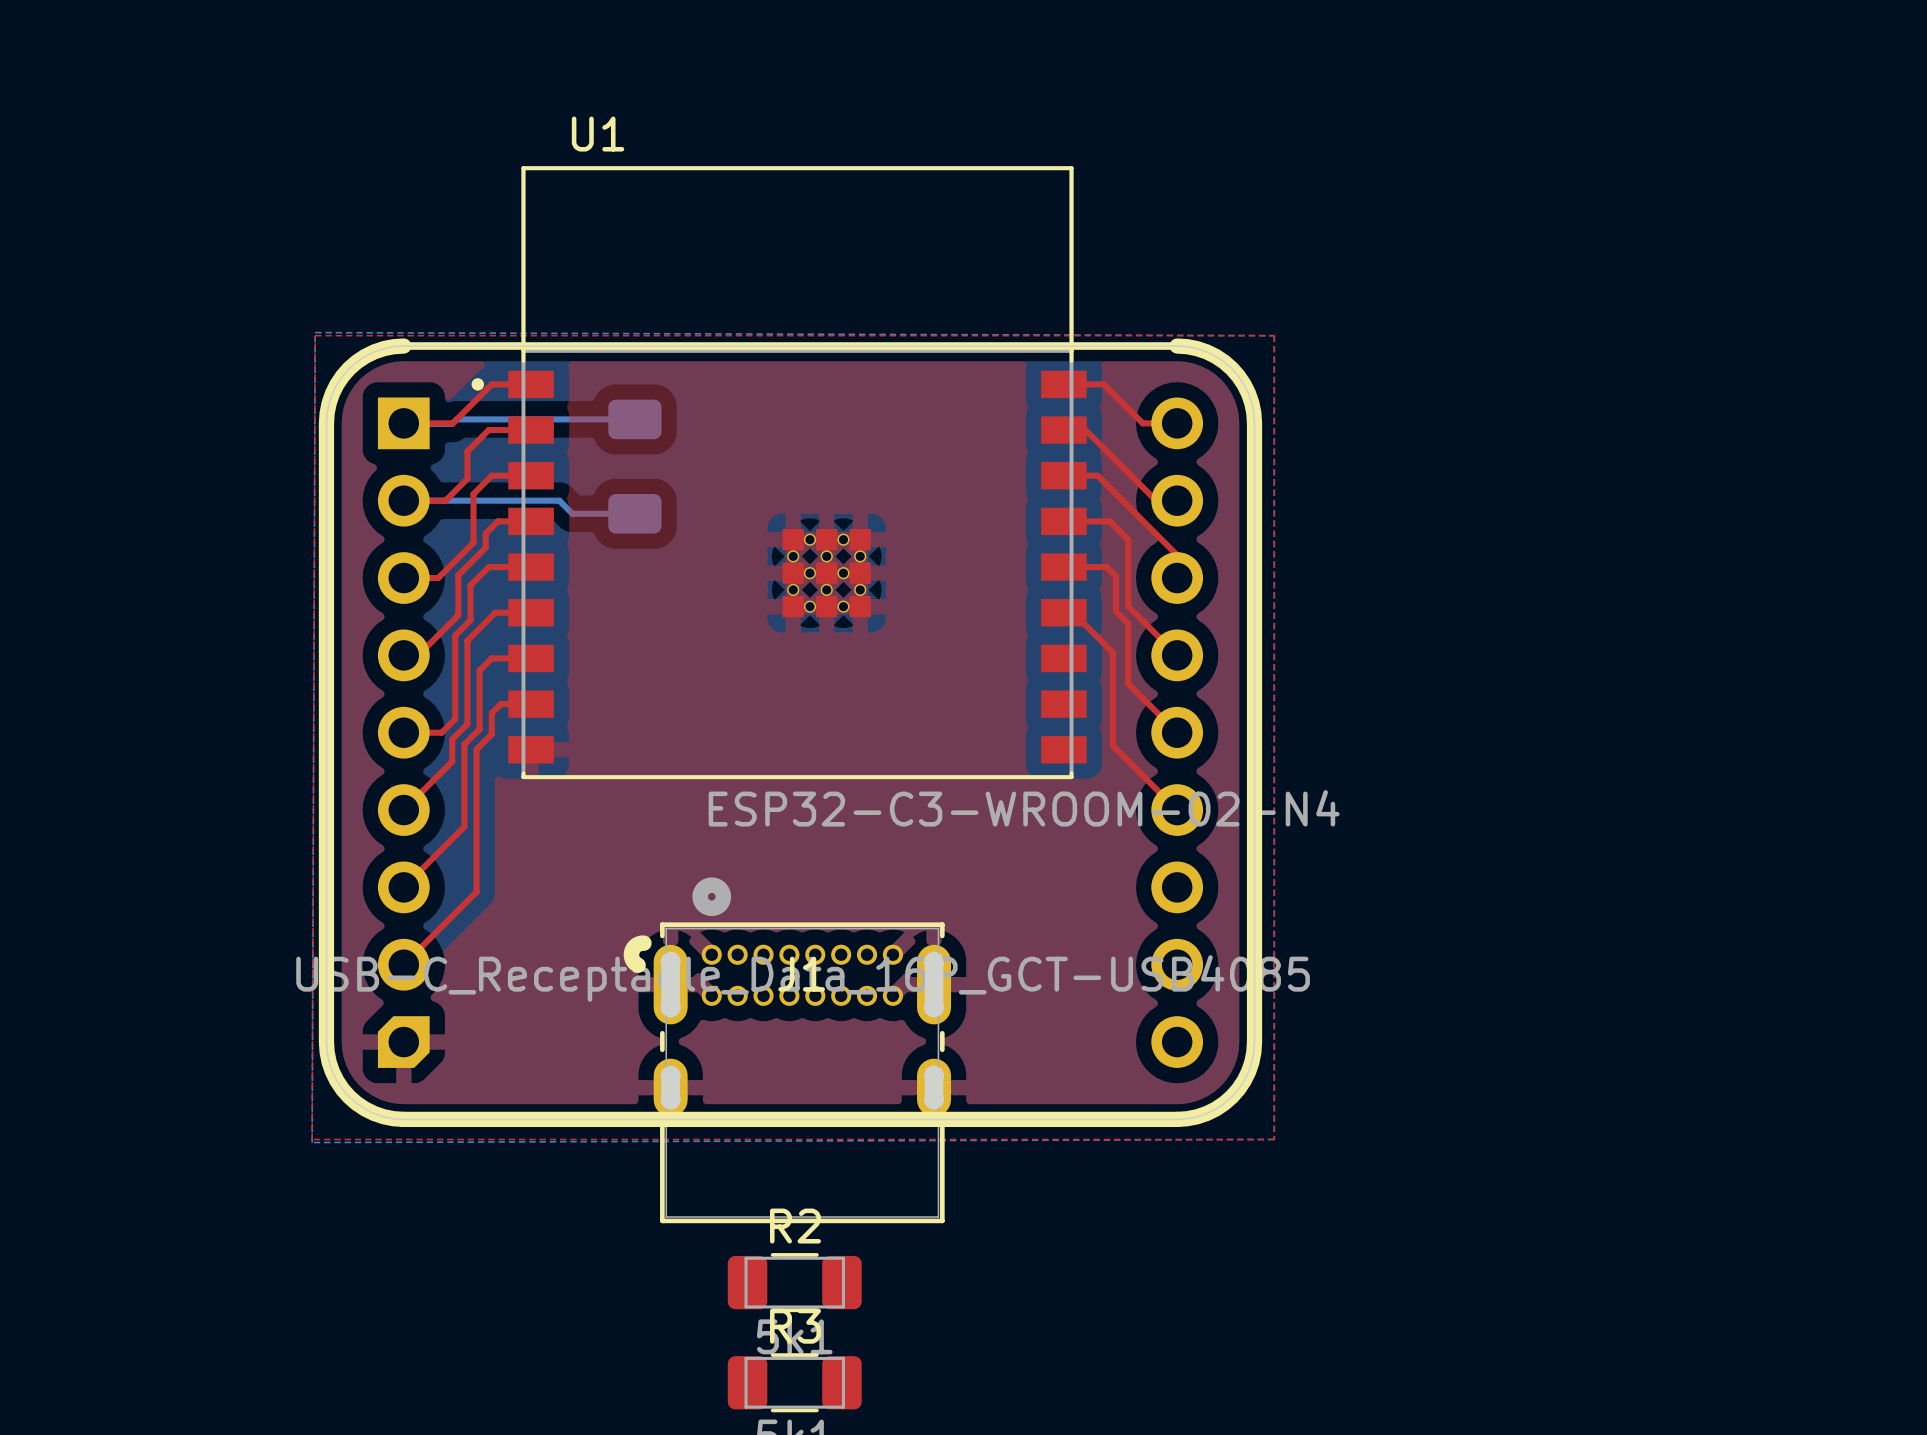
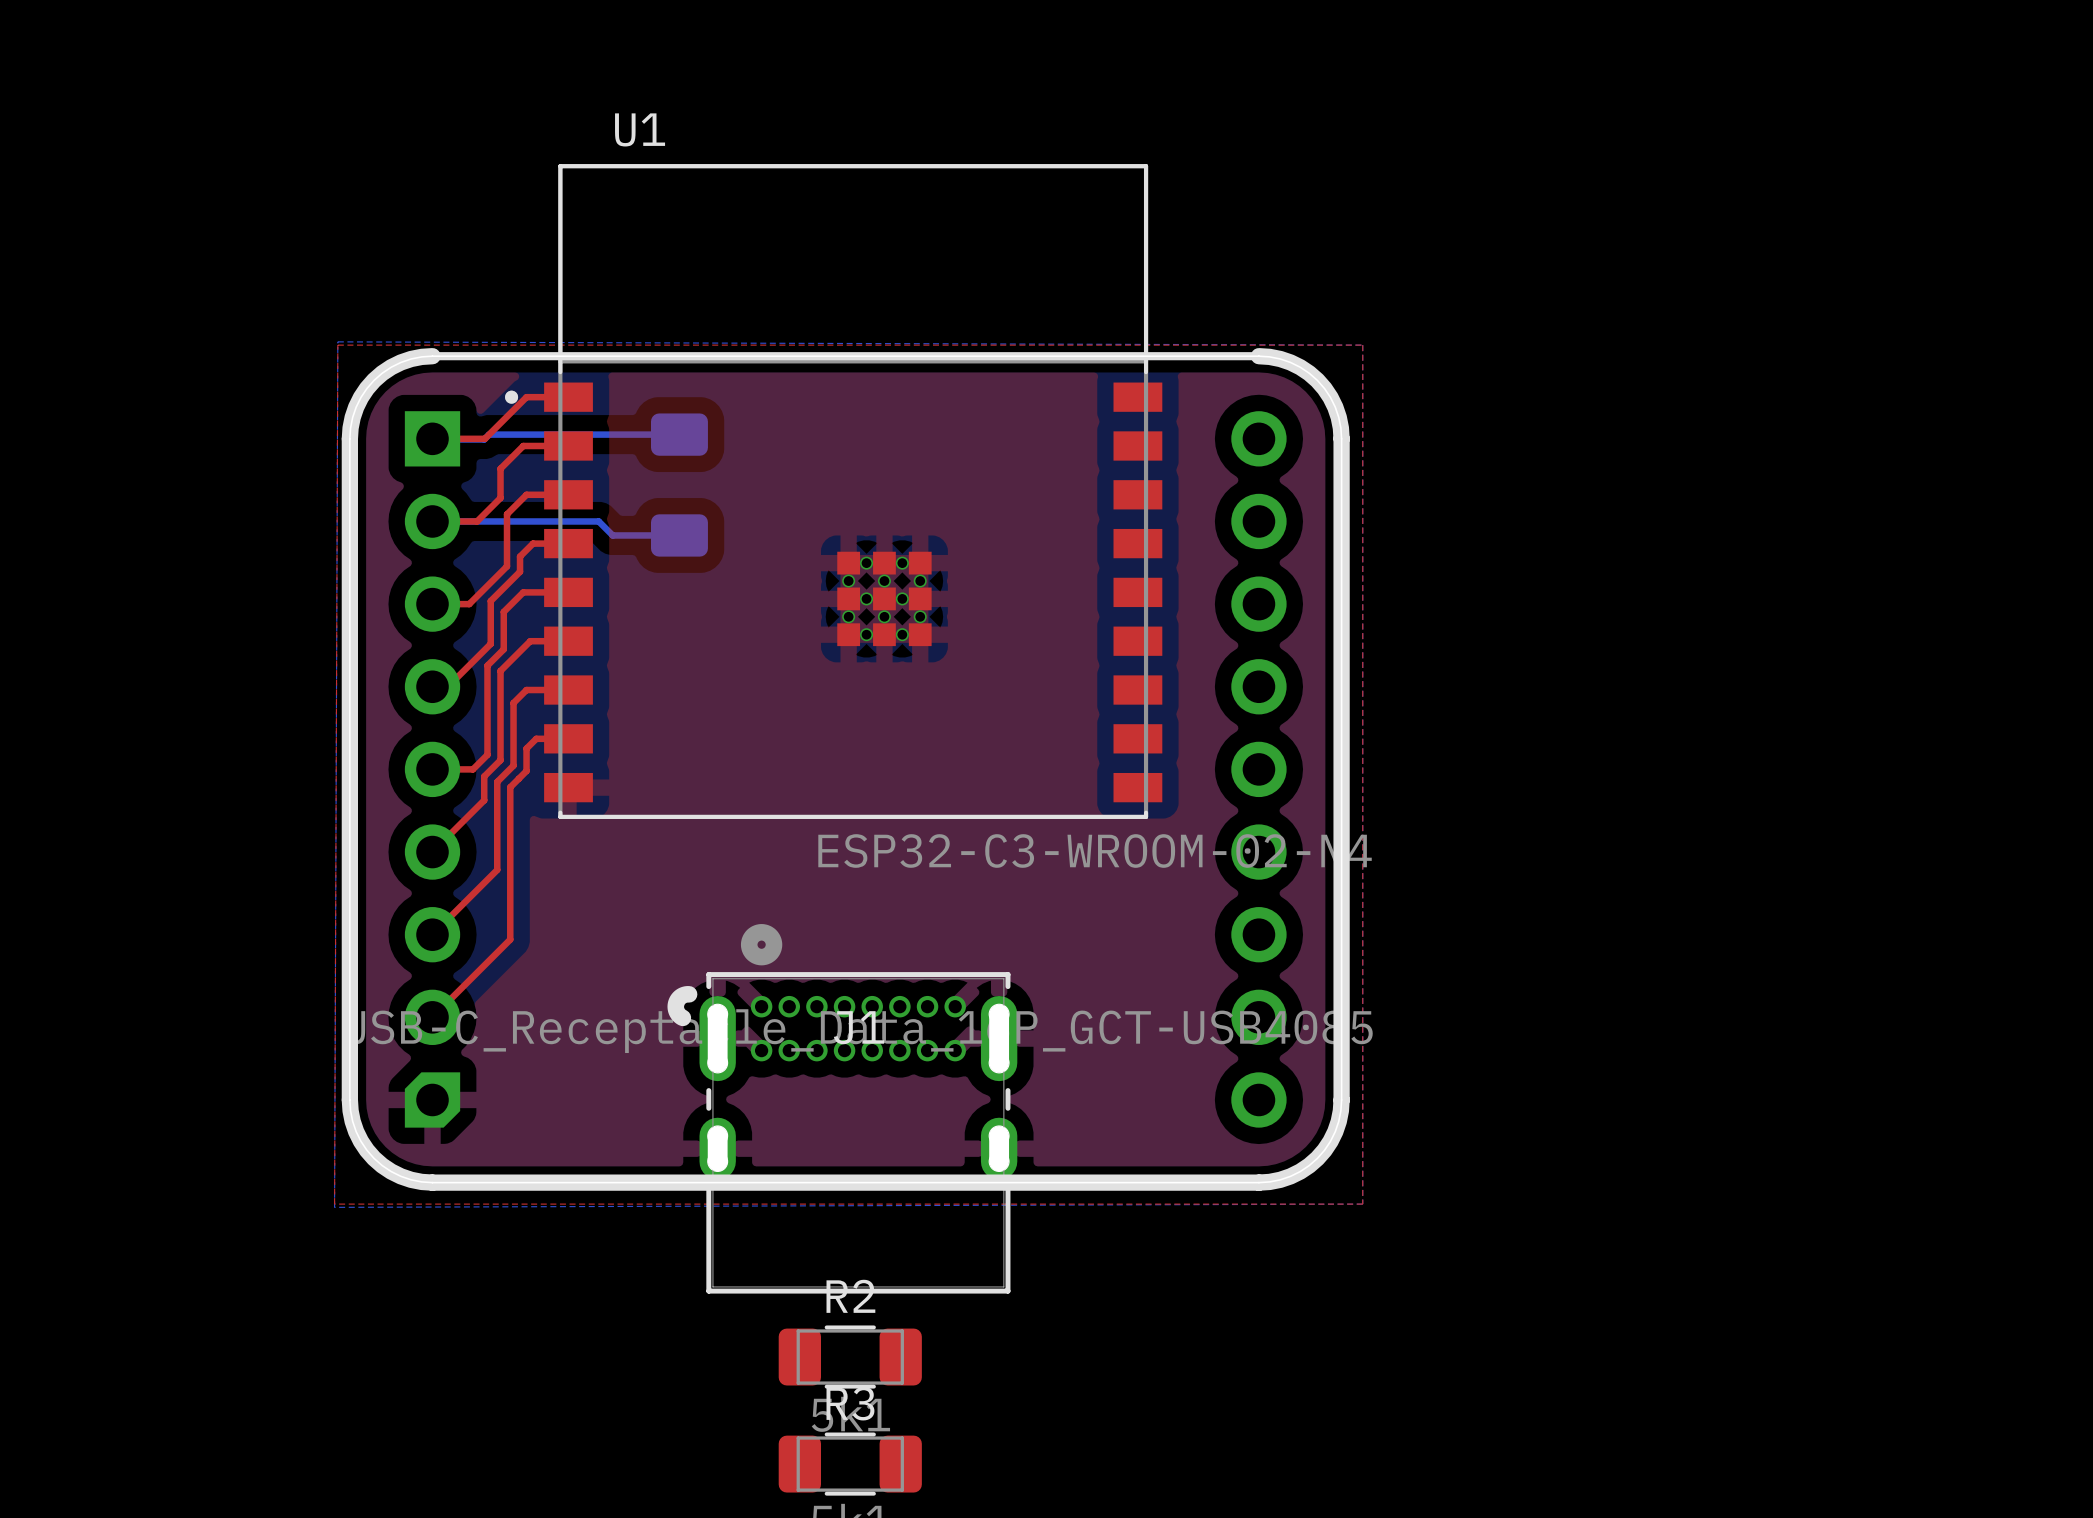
top track: (1063, 384) (1103, 384) (1142, 423) (1177, 423) -> none
top track: (1063, 430) (1085, 430) (1156, 500) (1177, 500) -> none
top track: (1063, 475) (1097, 475) (1177, 555) (1177, 578) -> none
top track: (1063, 521) (1109, 521) (1128, 539) (1128, 606) (1177, 655) -> none
top track: (1063, 567) (1106, 567) (1115, 576) (1115, 611) (1128, 623) (1128, 683) (1177, 732) -> none
top track: (1063, 612) (1073, 612) (1112, 652) (1112, 745) (1177, 810) -> none

